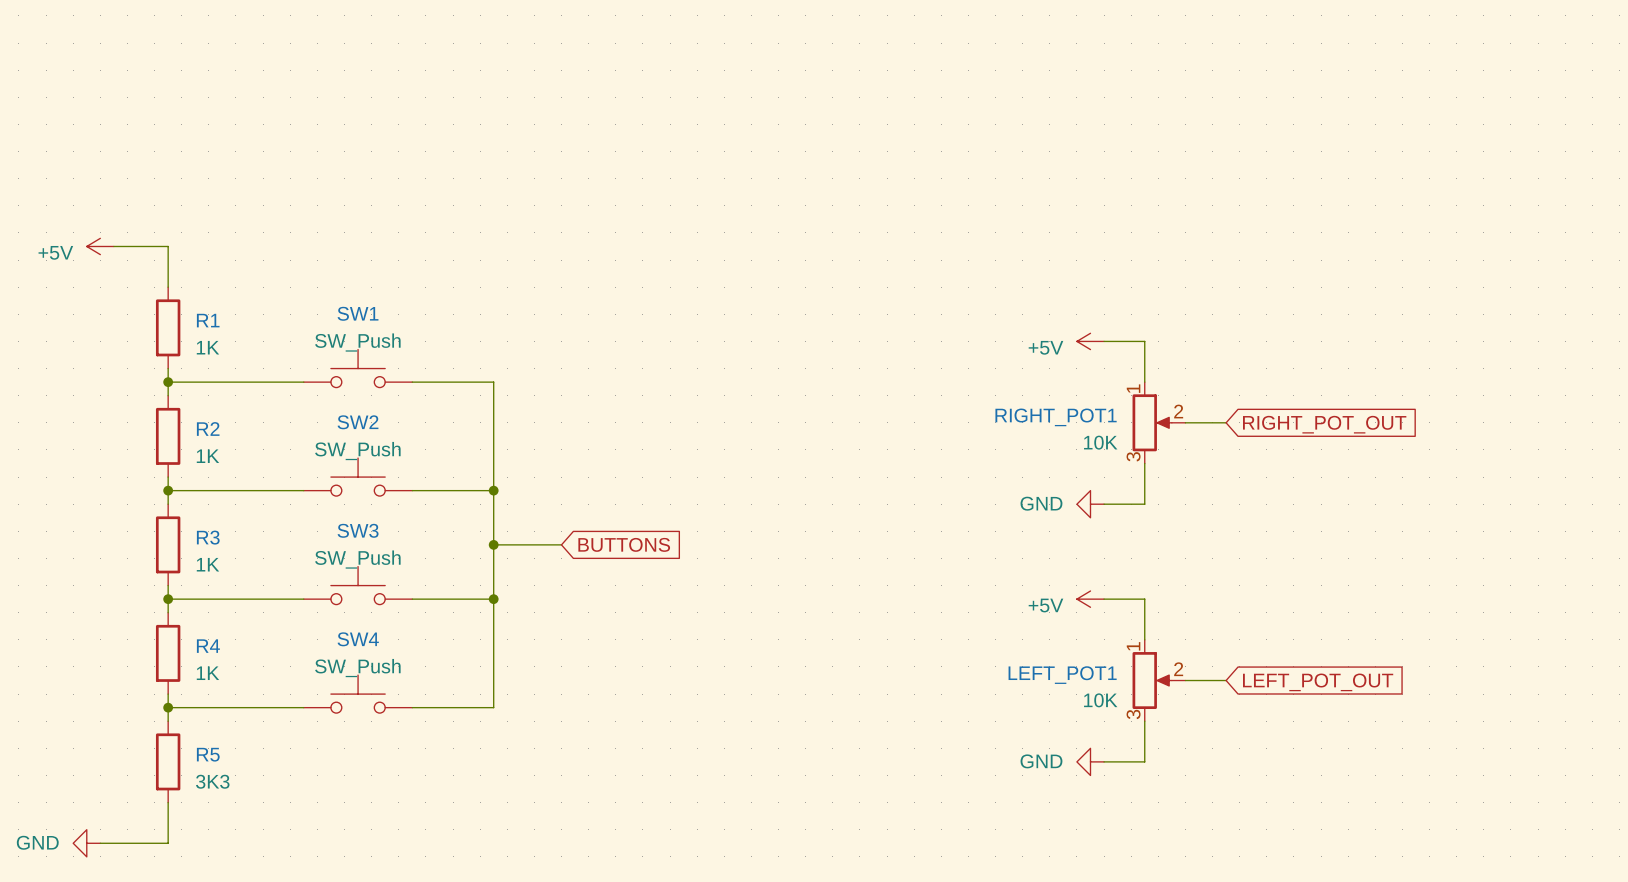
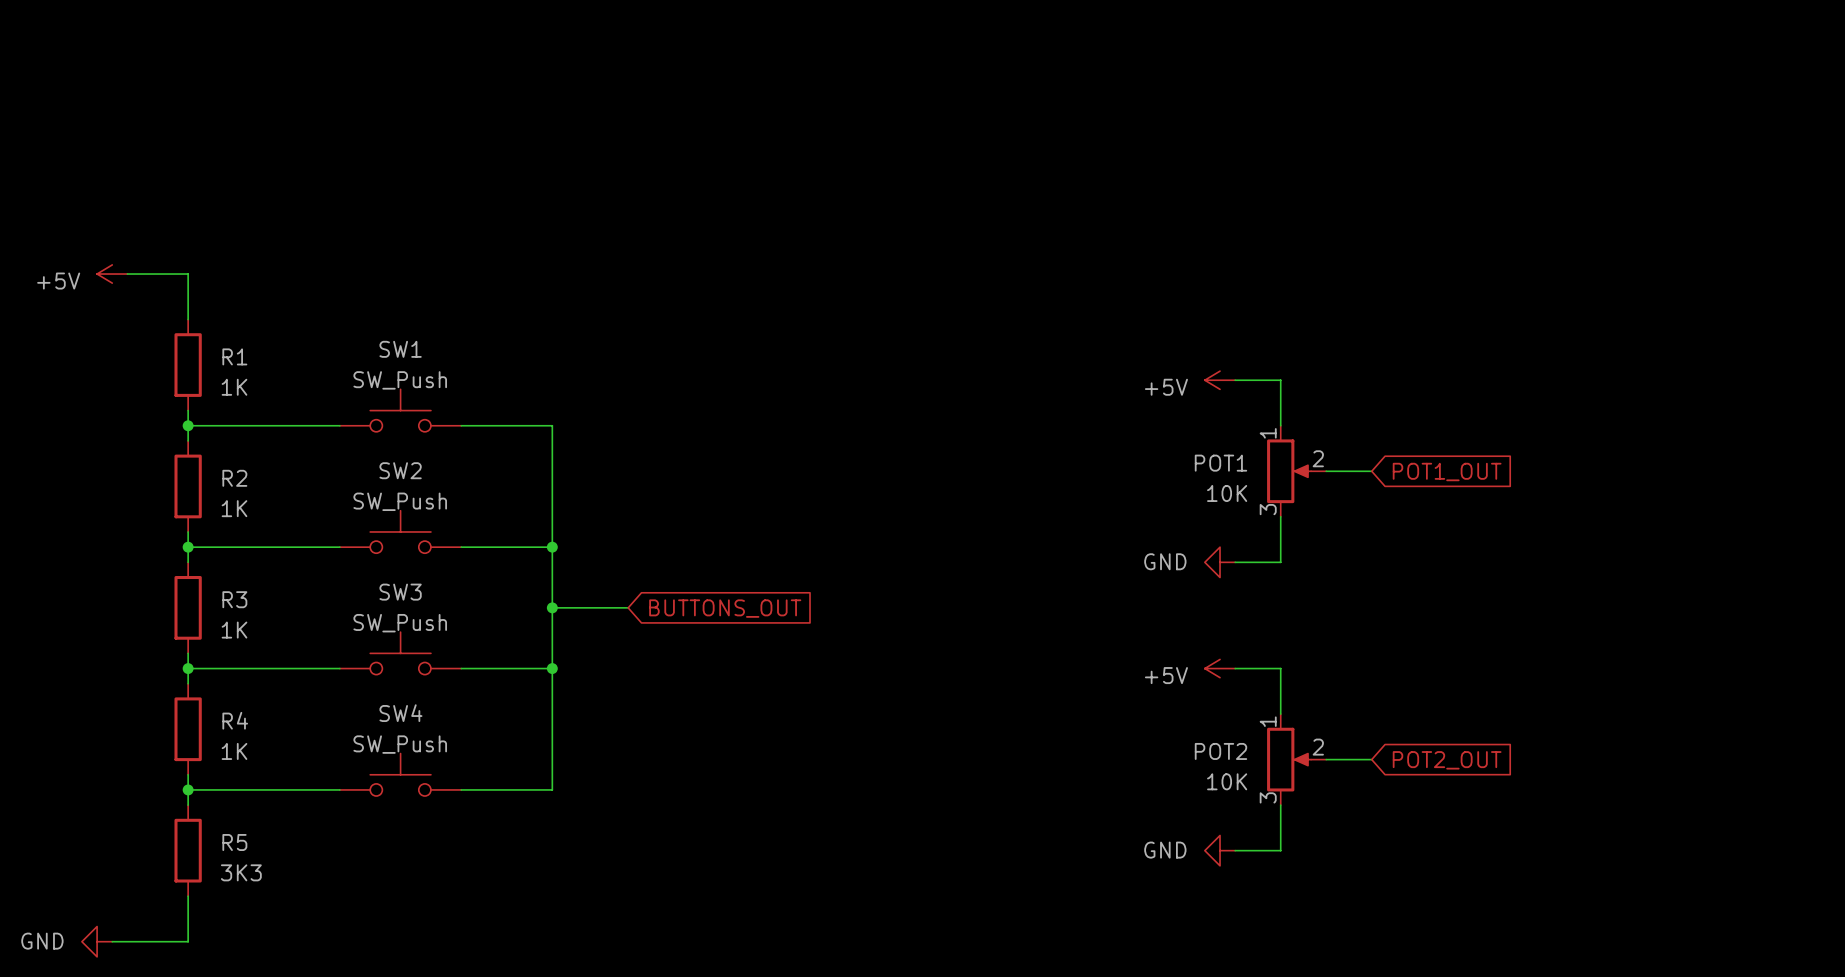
RIGHT_POT1 name: RIGHT_POT1 (1056, 417) -> POT1 (1220, 463)
global label: RIGHT_POT_OUT (1324, 424) -> POT1_OUT (1447, 472)
global label: BUTTONS (624, 544) -> BUTTONS_OUT (725, 608)
LEFT_POT1 name: LEFT_POT1 (1062, 675) -> POT2 (1220, 751)
global label: LEFT_POT_OUT (1318, 682) -> POT2_OUT (1447, 760)

